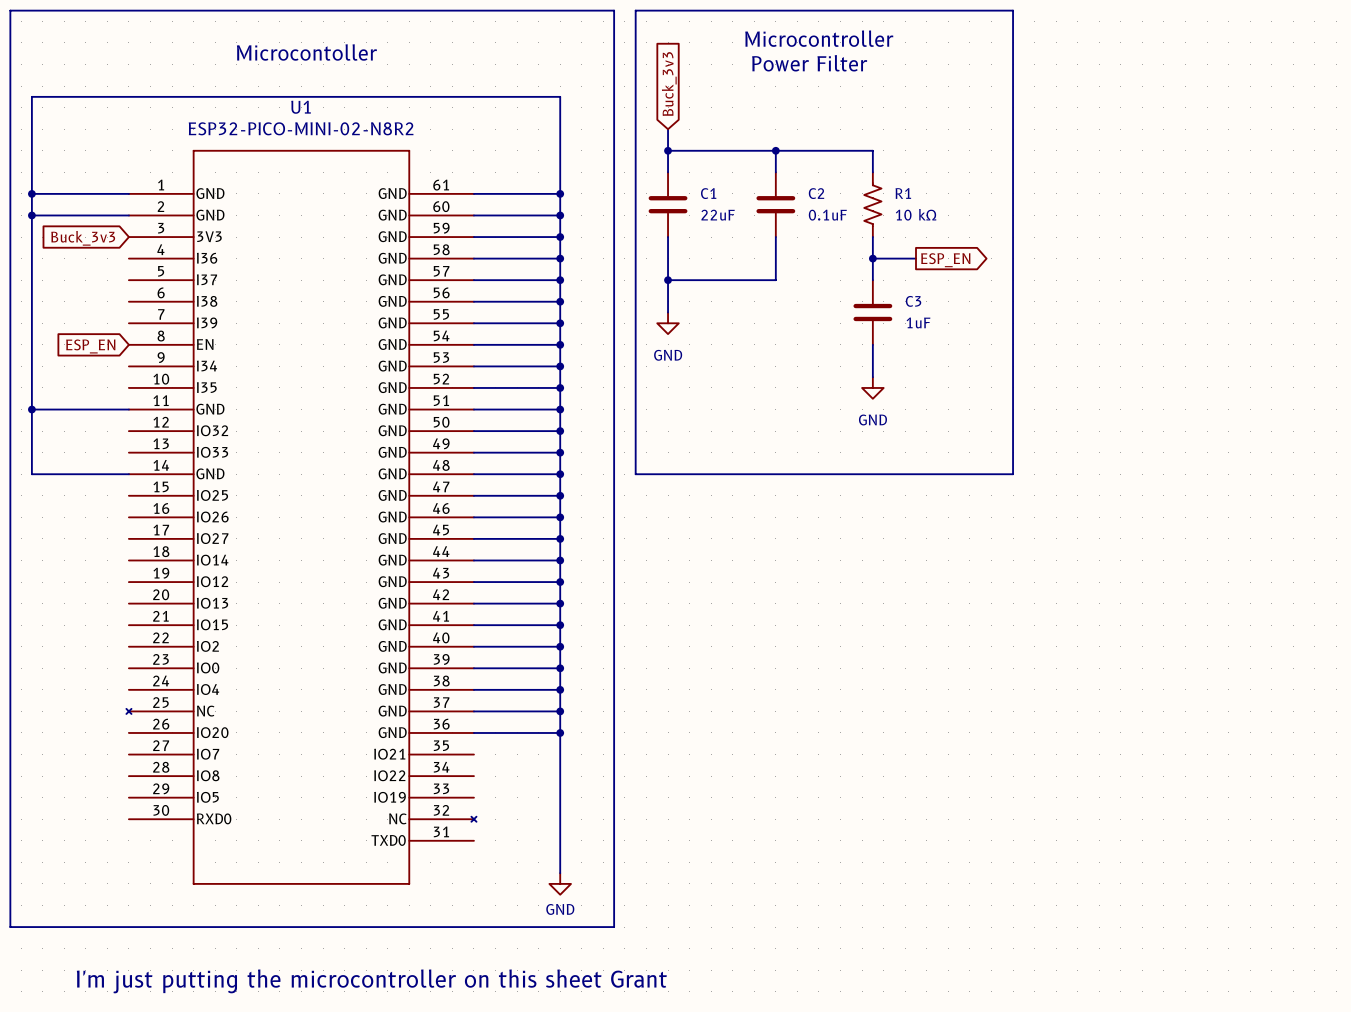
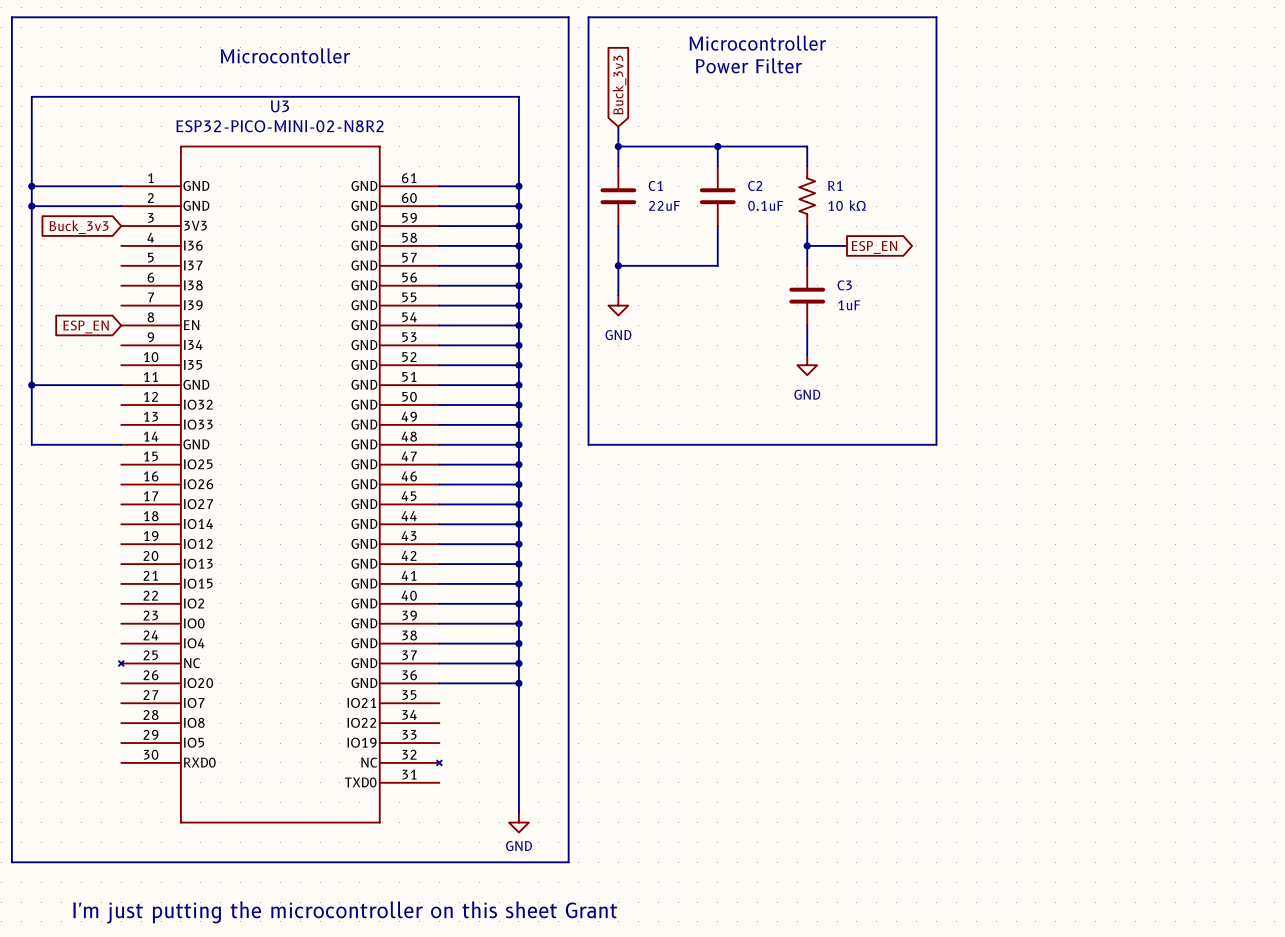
U1 name: U1 (301, 107) -> U3 (279, 106)

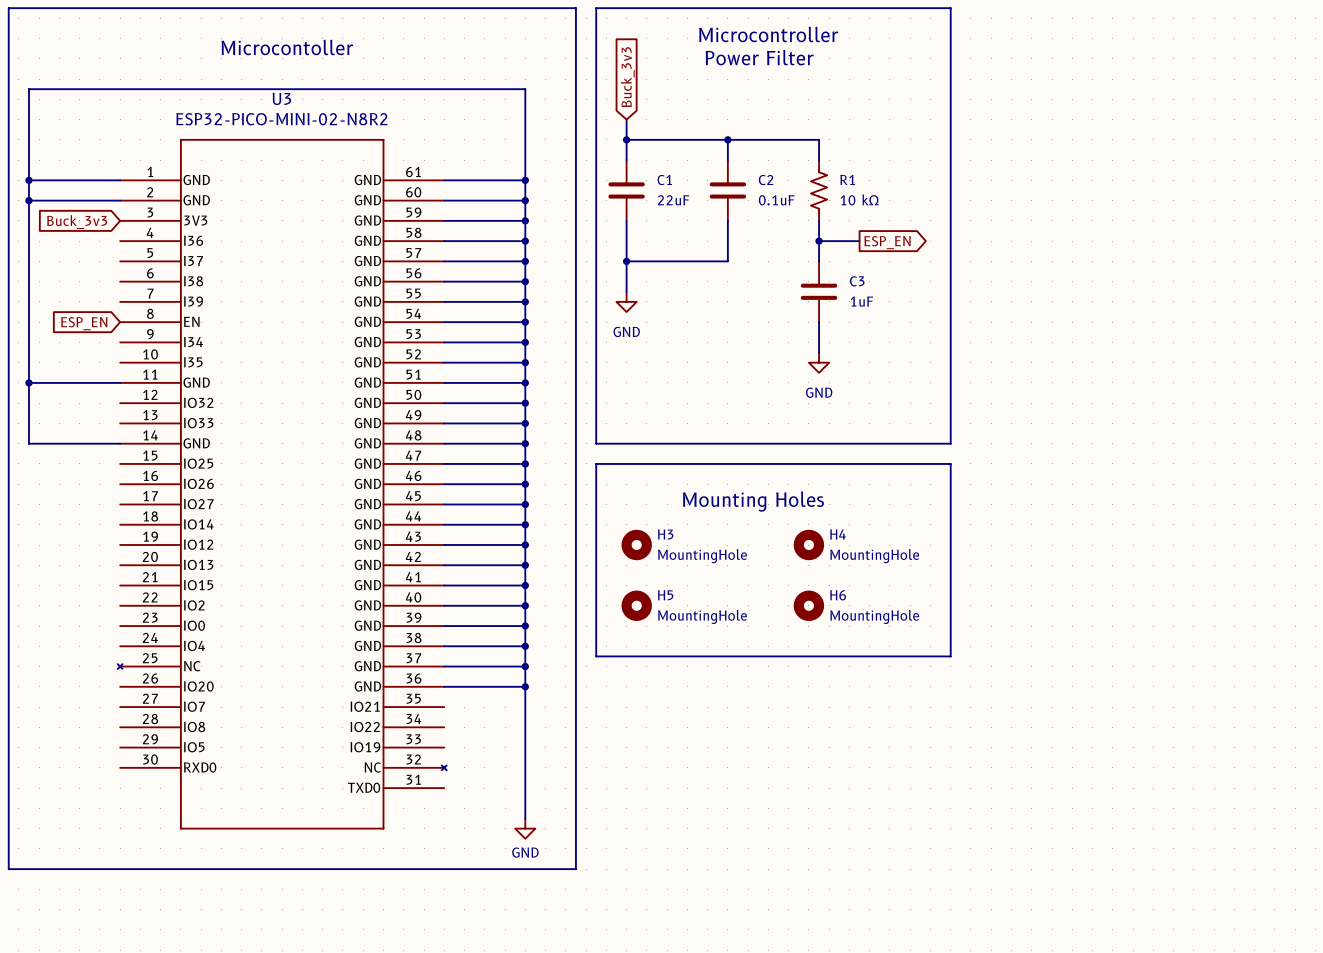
line: none -> (596, 463) (950, 463) (950, 656) (596, 656) (596, 463)
text: none -> Mounting Holes (753, 501)
H3: none -> MountingHole (636, 545)
H4: none -> MountingHole (808, 545)
H5: none -> MountingHole (636, 605)
H6: none -> MountingHole (808, 605)
text: I'm just putting the microcontroller on this sheet Grant (345, 912) -> none

